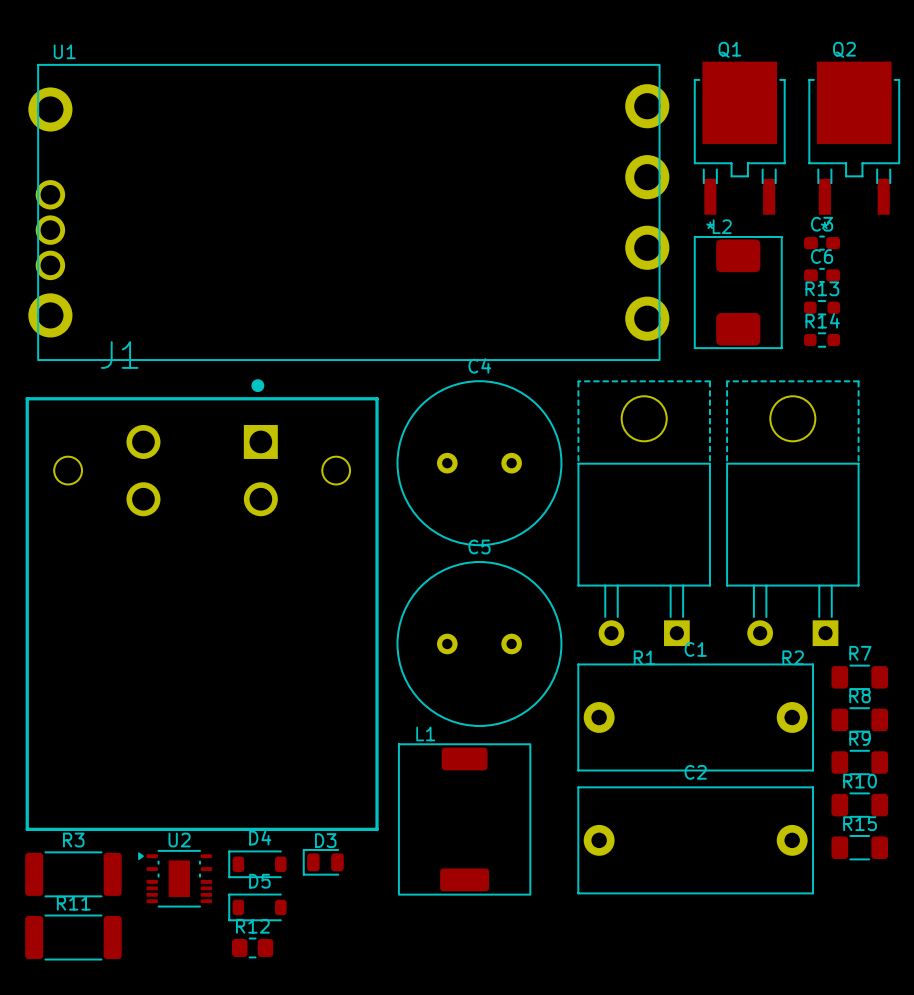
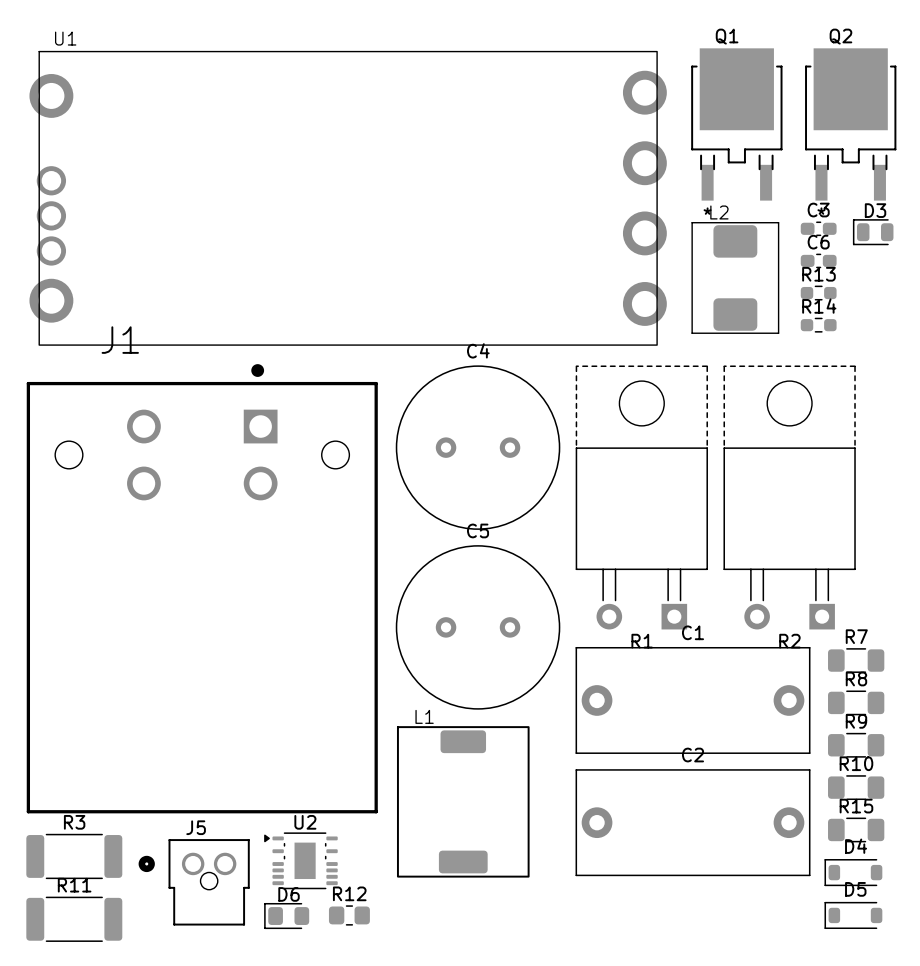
D3 position: (323, 862) -> (873, 232)
D4 position: (257, 864) -> (853, 872)
U2 position: (175, 878) -> (300, 860)
J5: none -> (194, 882)
D5 position: (257, 907) -> (853, 915)
D6: none -> (286, 916)
R12 position: (252, 947) -> (349, 915)

